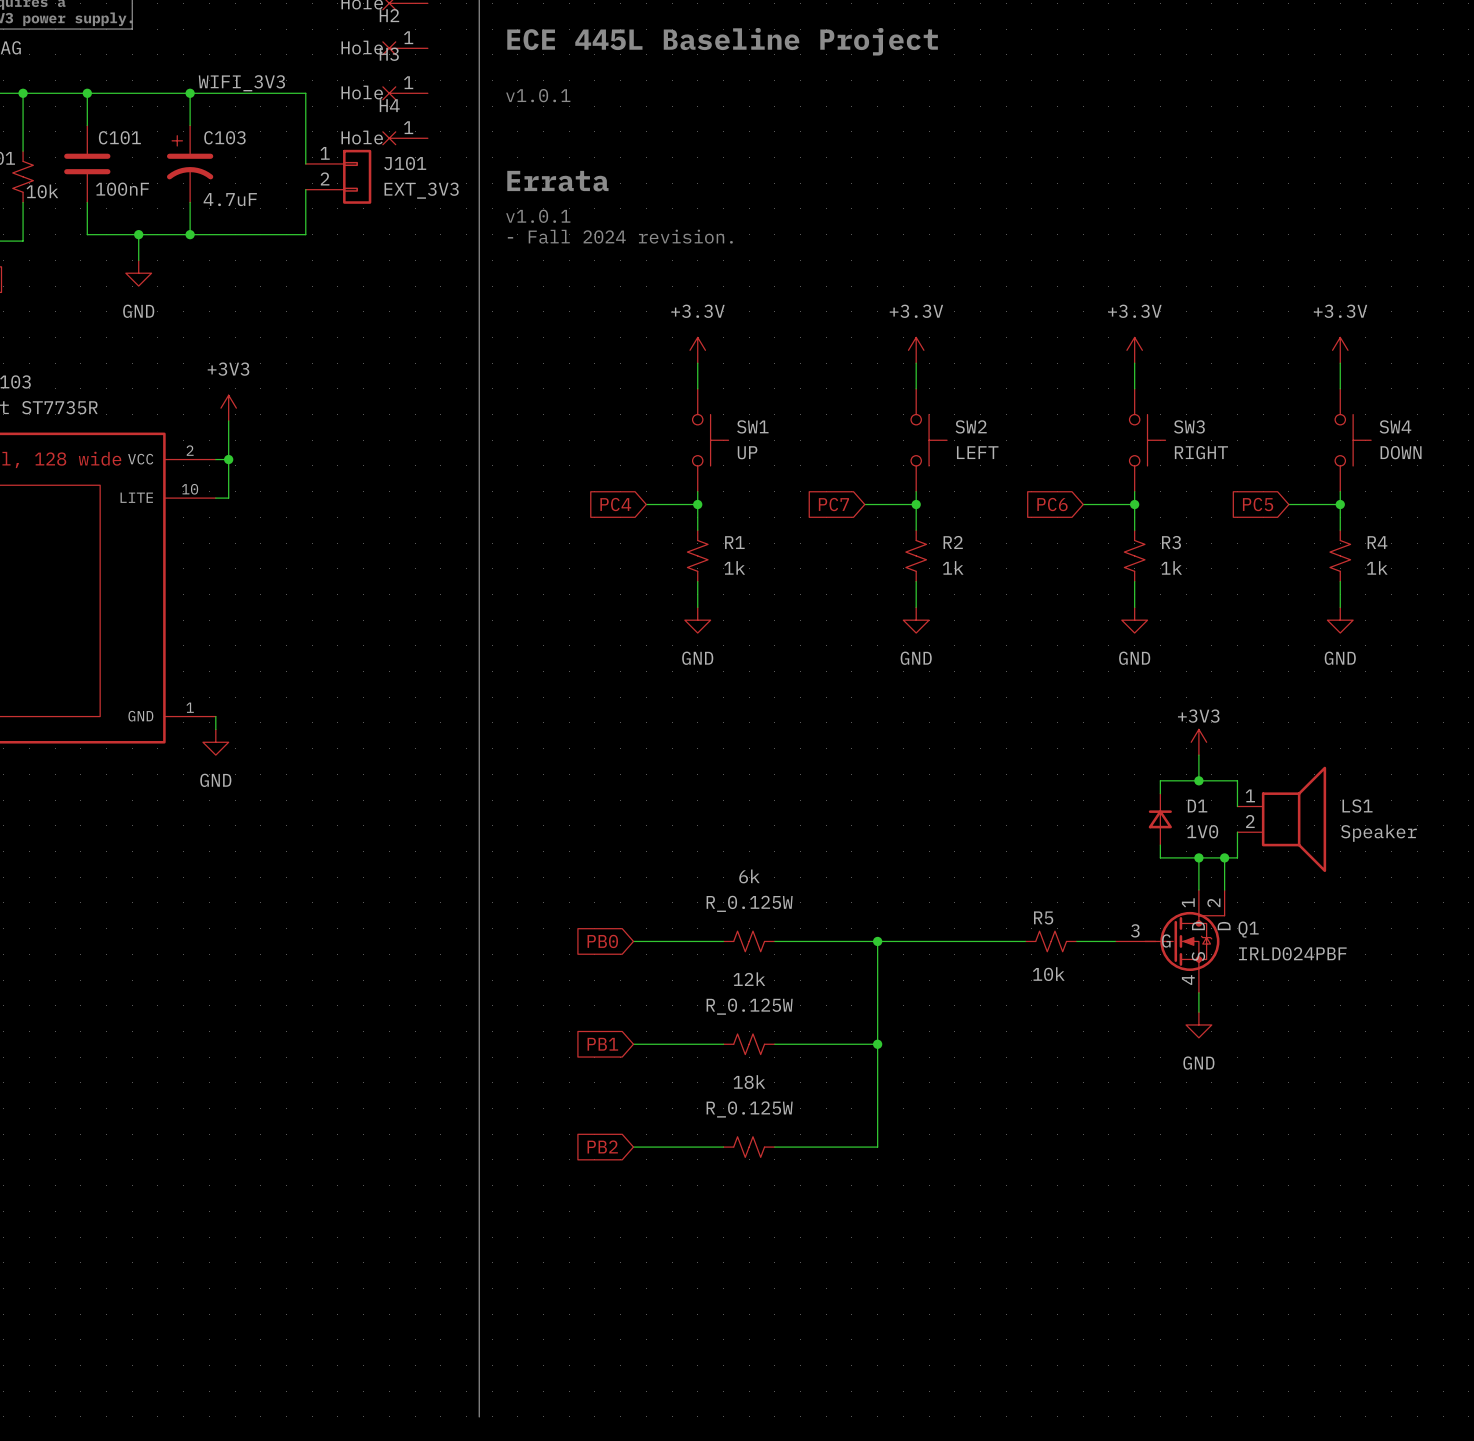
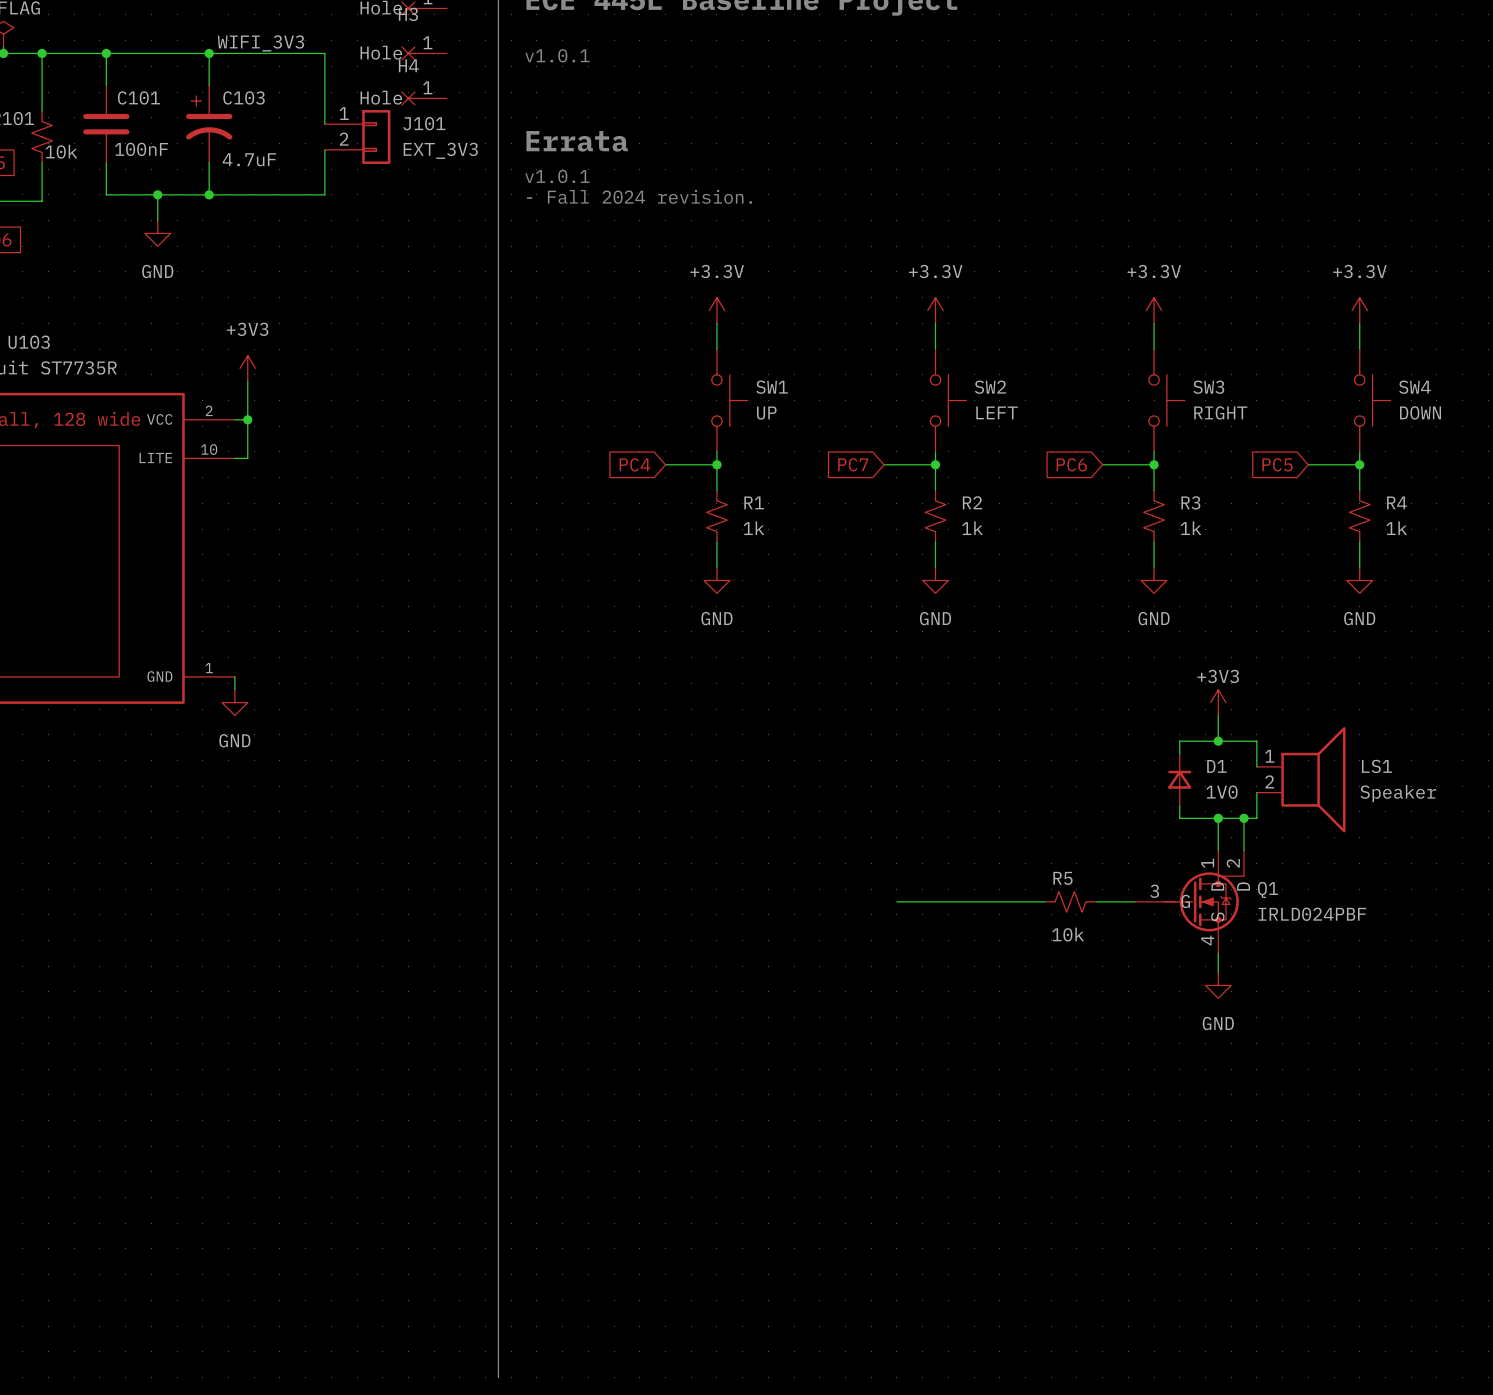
global label: PB0 (602, 941) -> none
wire: (633, 941) (723, 941) -> none
6k: R_0.125W (749, 941) -> none
wire: (774, 941) (877, 941) (877, 1147) (774, 1147) -> none
junction: (877, 941) -> none
global label: PB1 (602, 1044) -> none
wire: (633, 1044) (723, 1044) -> none
12k: R_0.125W (749, 1044) -> none
wire: (774, 1044) (877, 1044) -> none
junction: (877, 1044) -> none
global label: PB2 (602, 1146) -> none
wire: (633, 1147) (723, 1147) -> none
18k: R_0.125W (749, 1147) -> none

